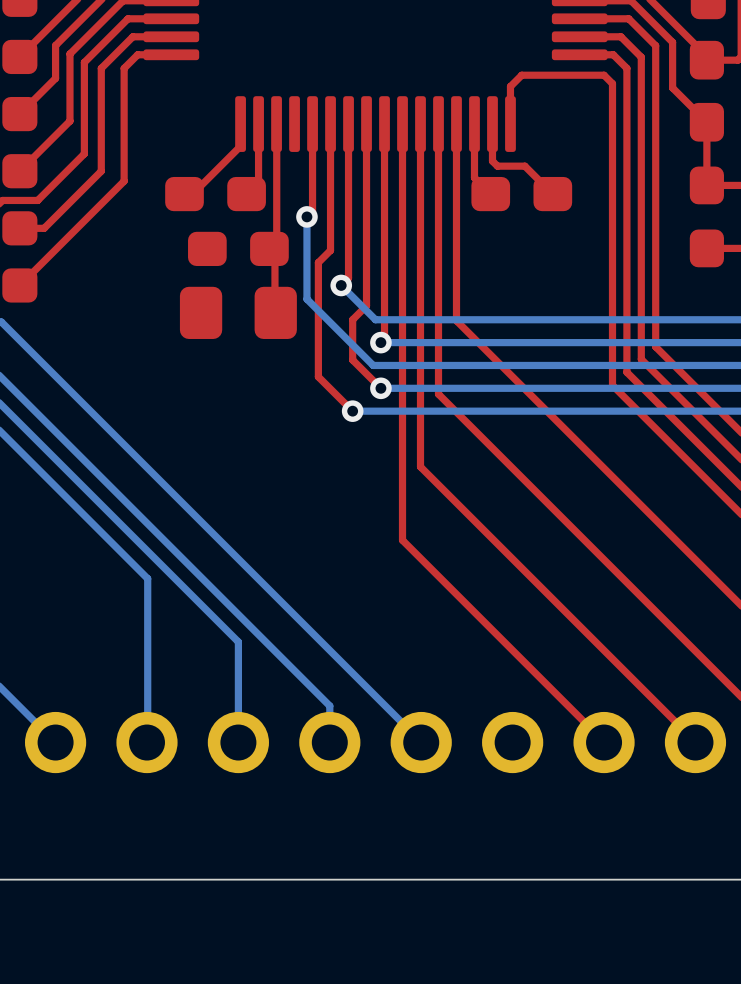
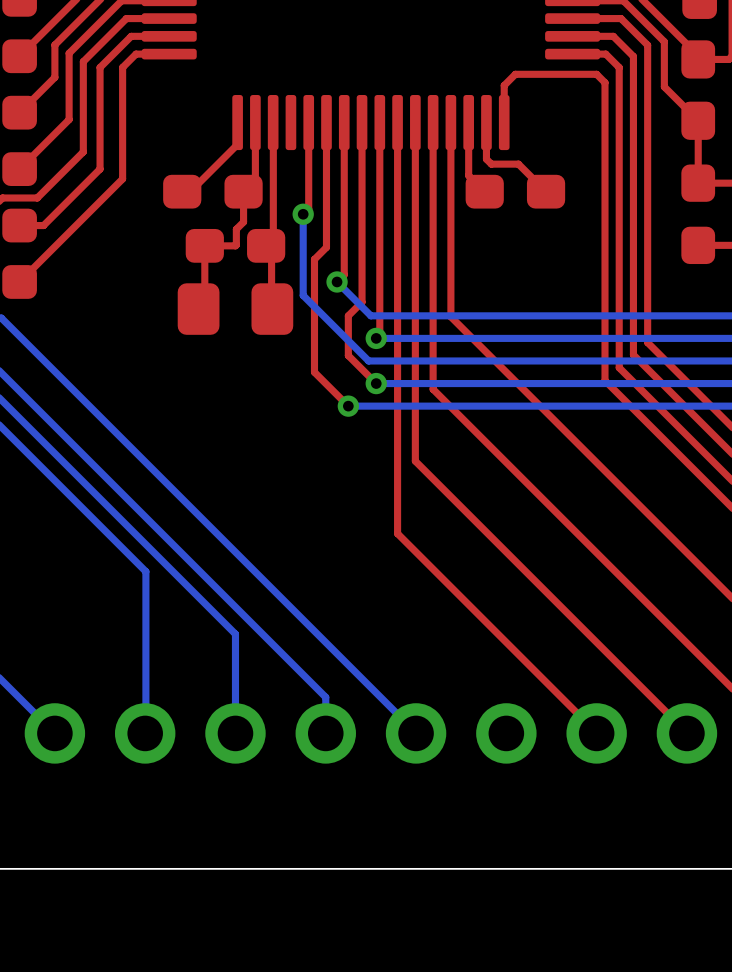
top track: none -> (243, 191) (243, 222) (236, 229) (236, 244) (204, 245) (204, 302)

